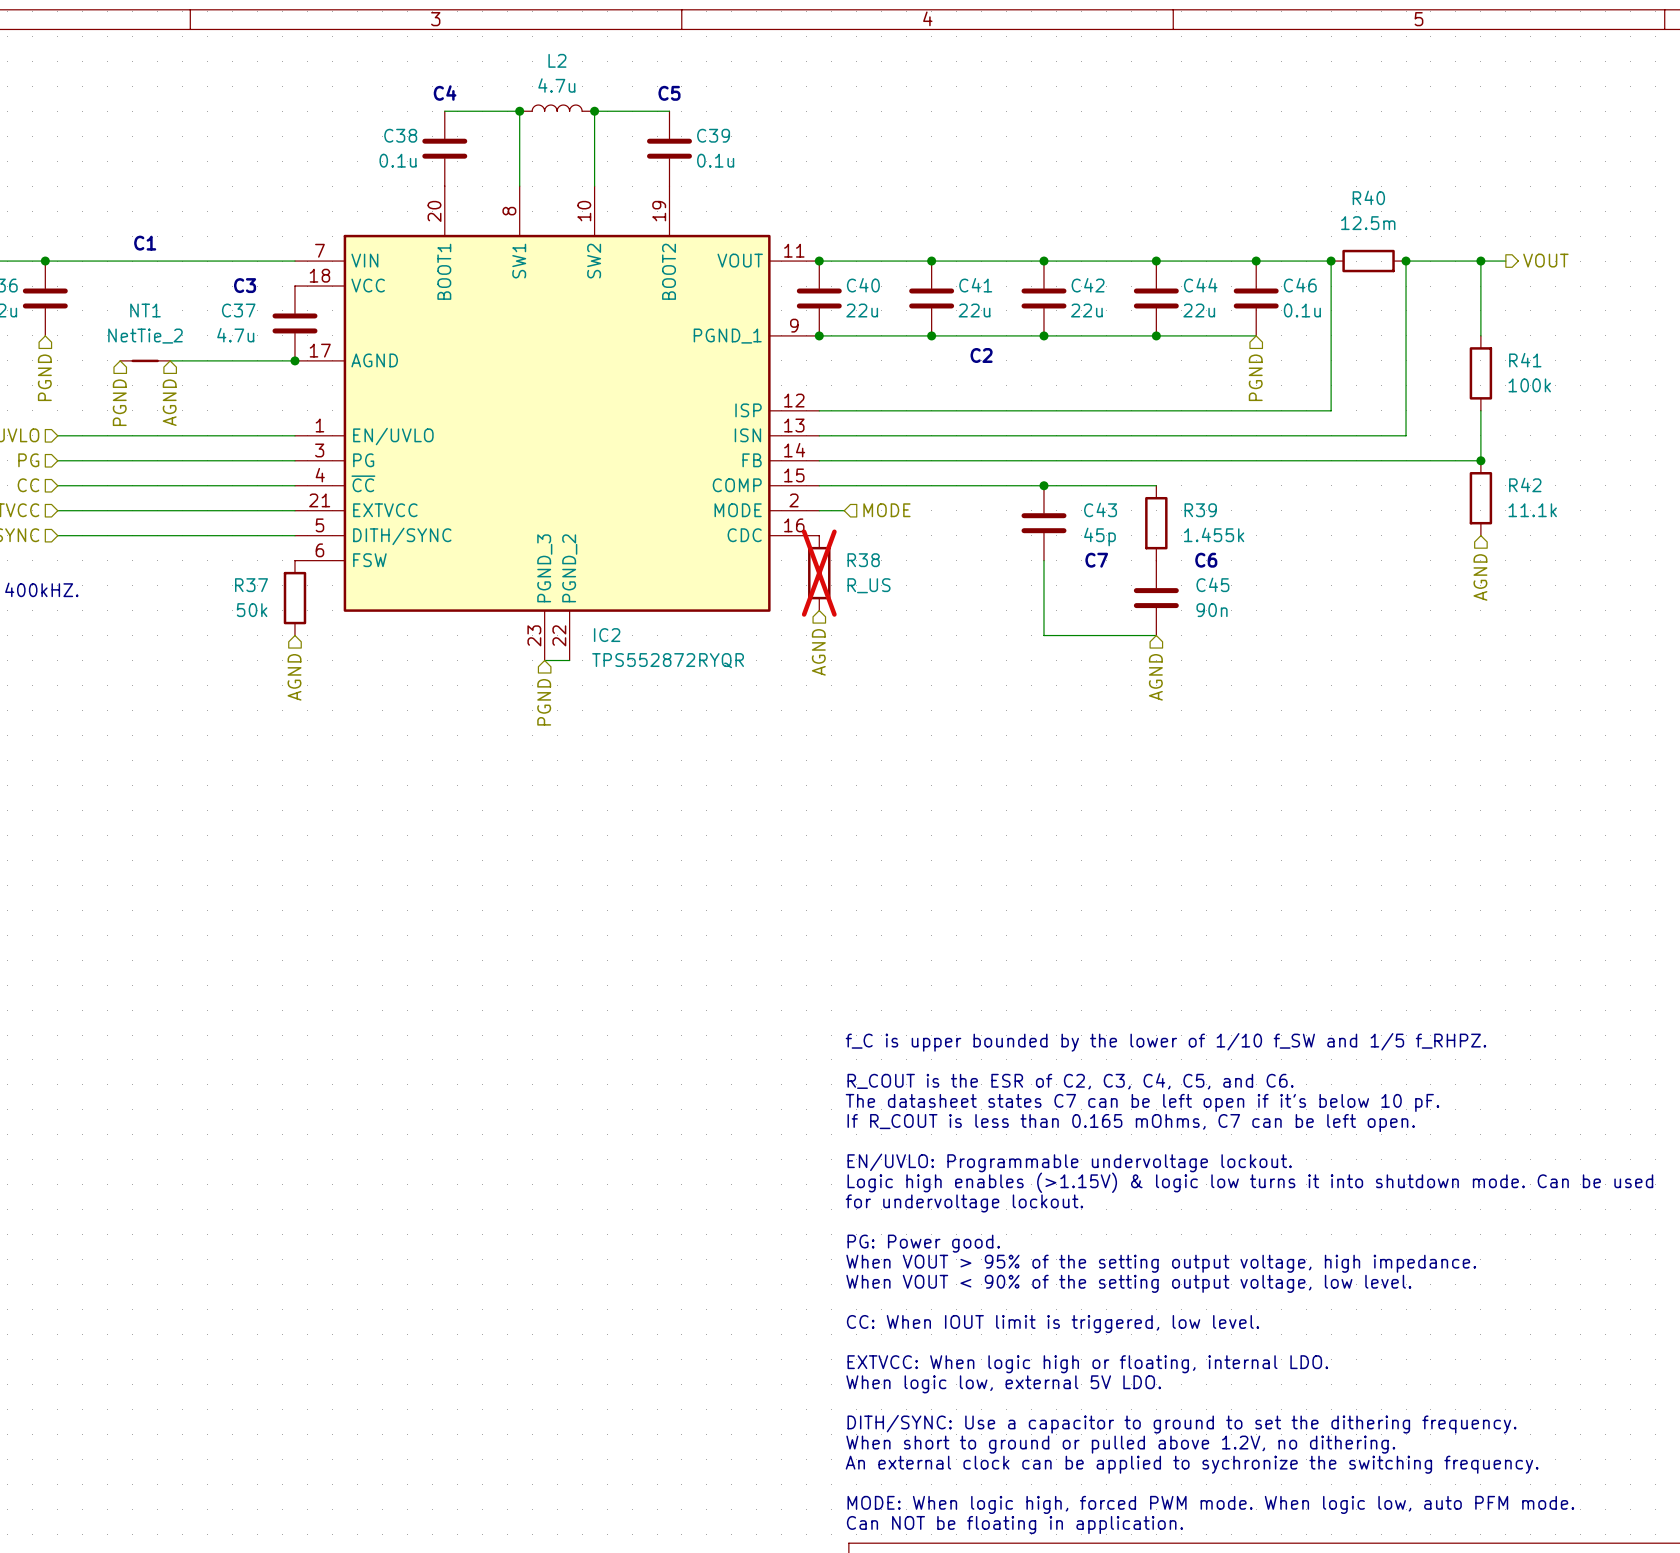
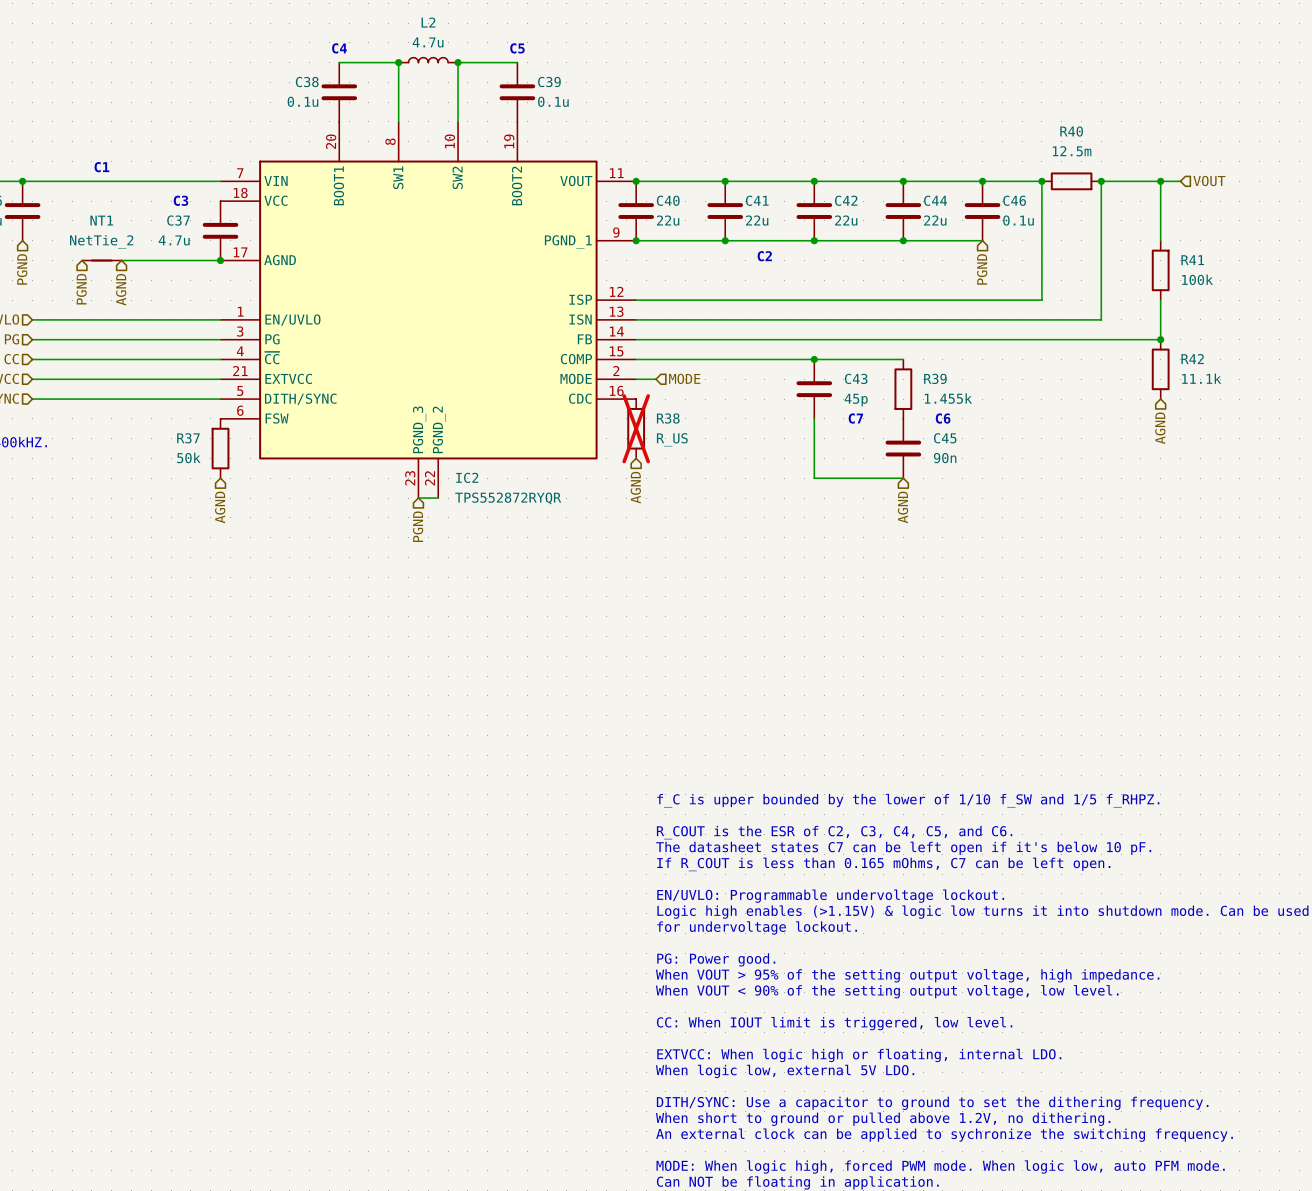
hierarchical label shape: output (1545, 260) -> input (1209, 180)

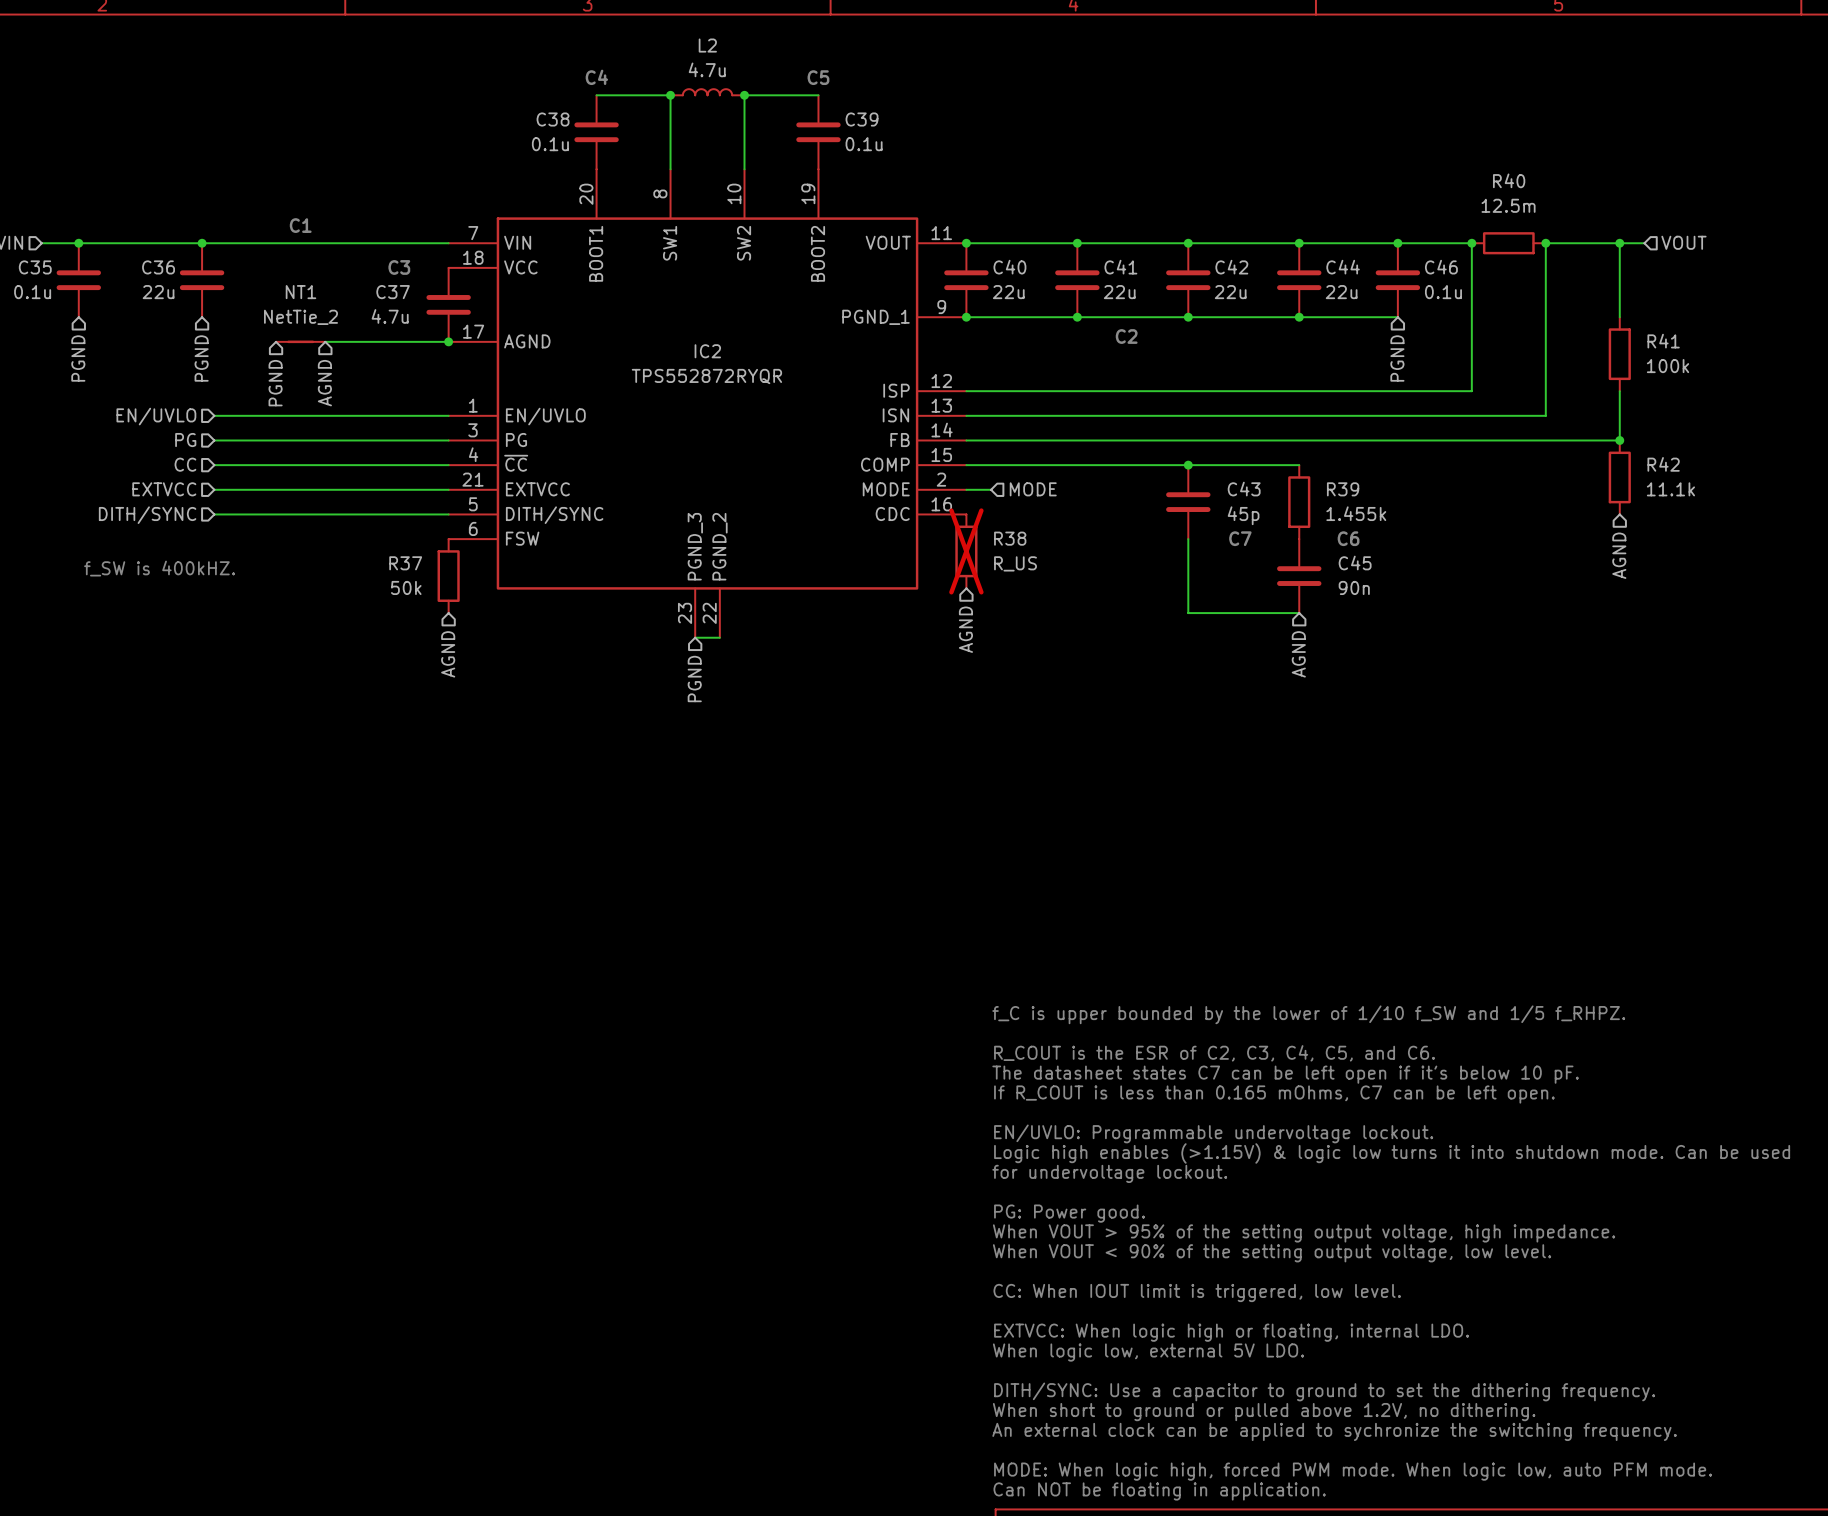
IC2 name position: IC2 (467, 477) -> IC2 (707, 351)
IC2 value position: TPS552872RYQR (508, 498) -> TPS552872RYQR (706, 376)

